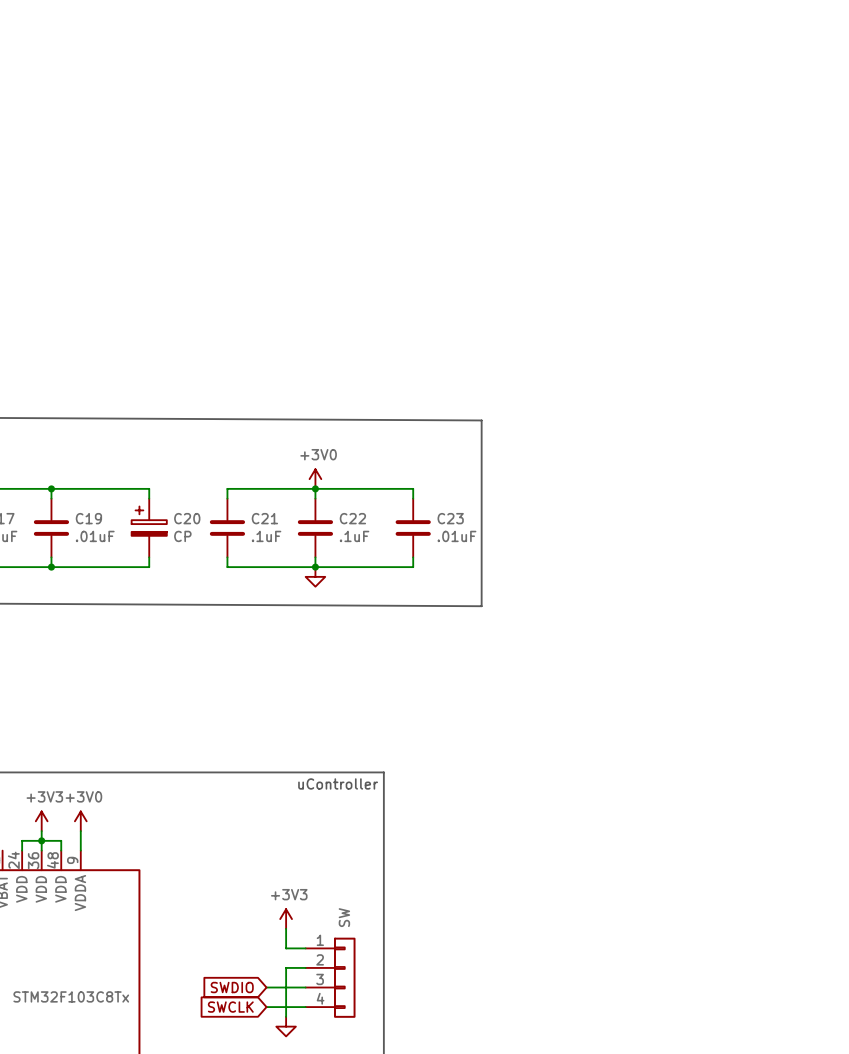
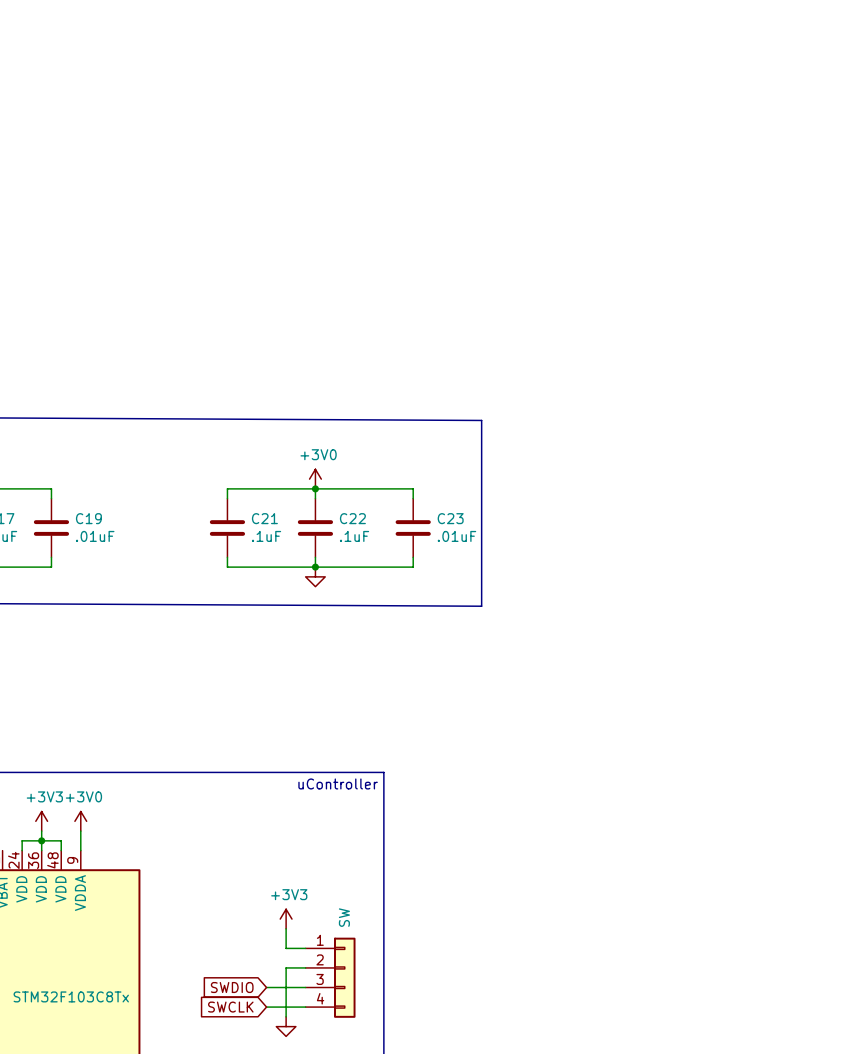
wire: (51, 488) (149, 488) (149, 498) -> none
junction: (51, 488) -> none
C20: CP (149, 528) -> none
wire: (149, 557) (149, 567) (51, 567) -> none
junction: (51, 567) -> none

